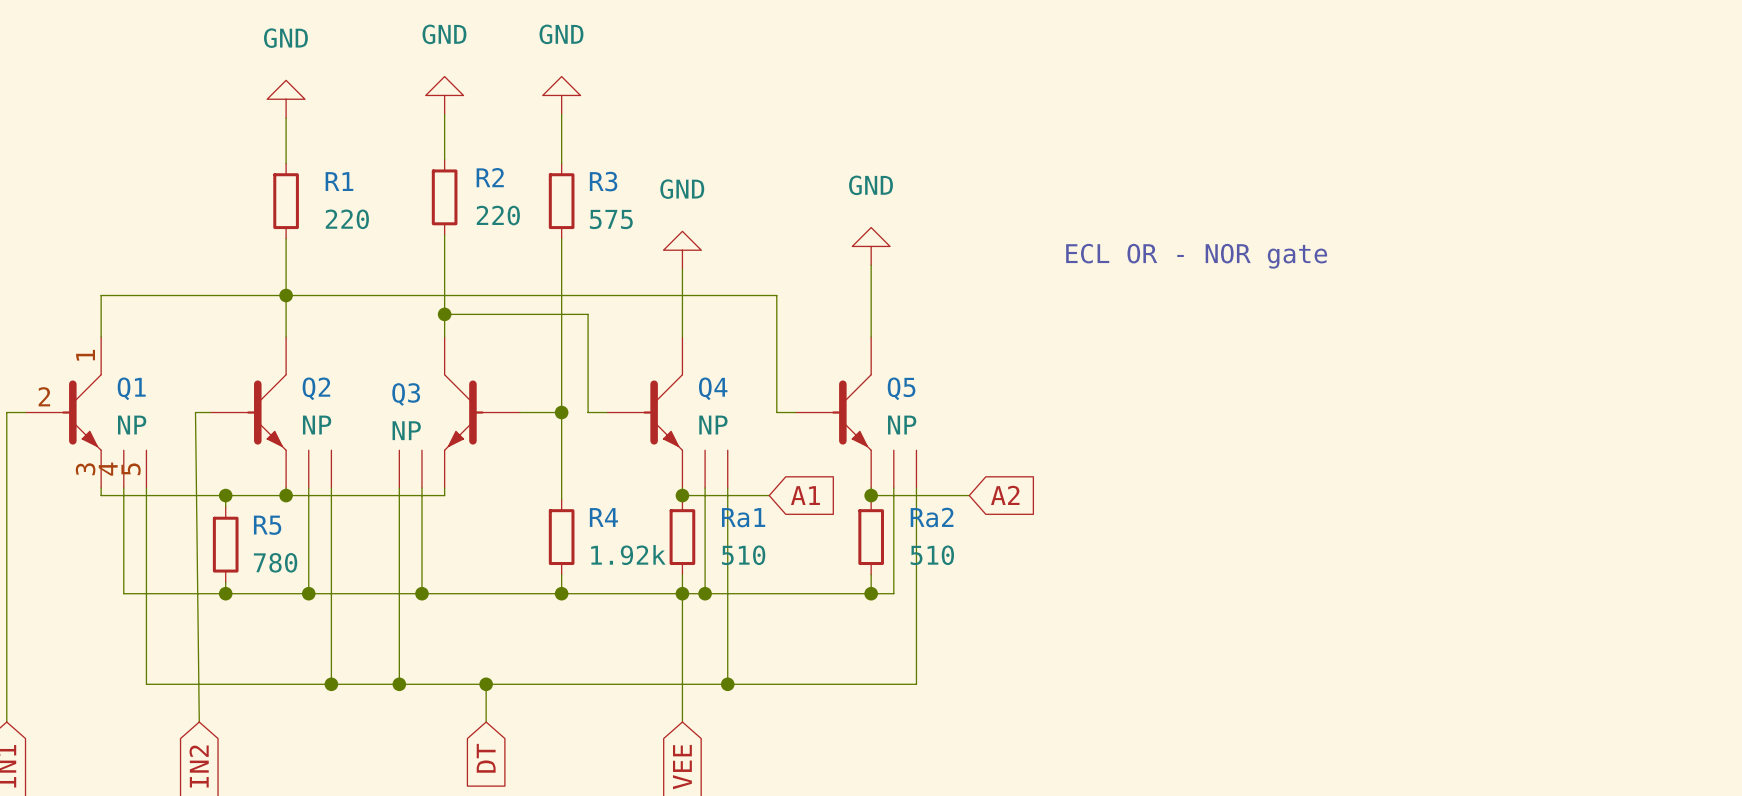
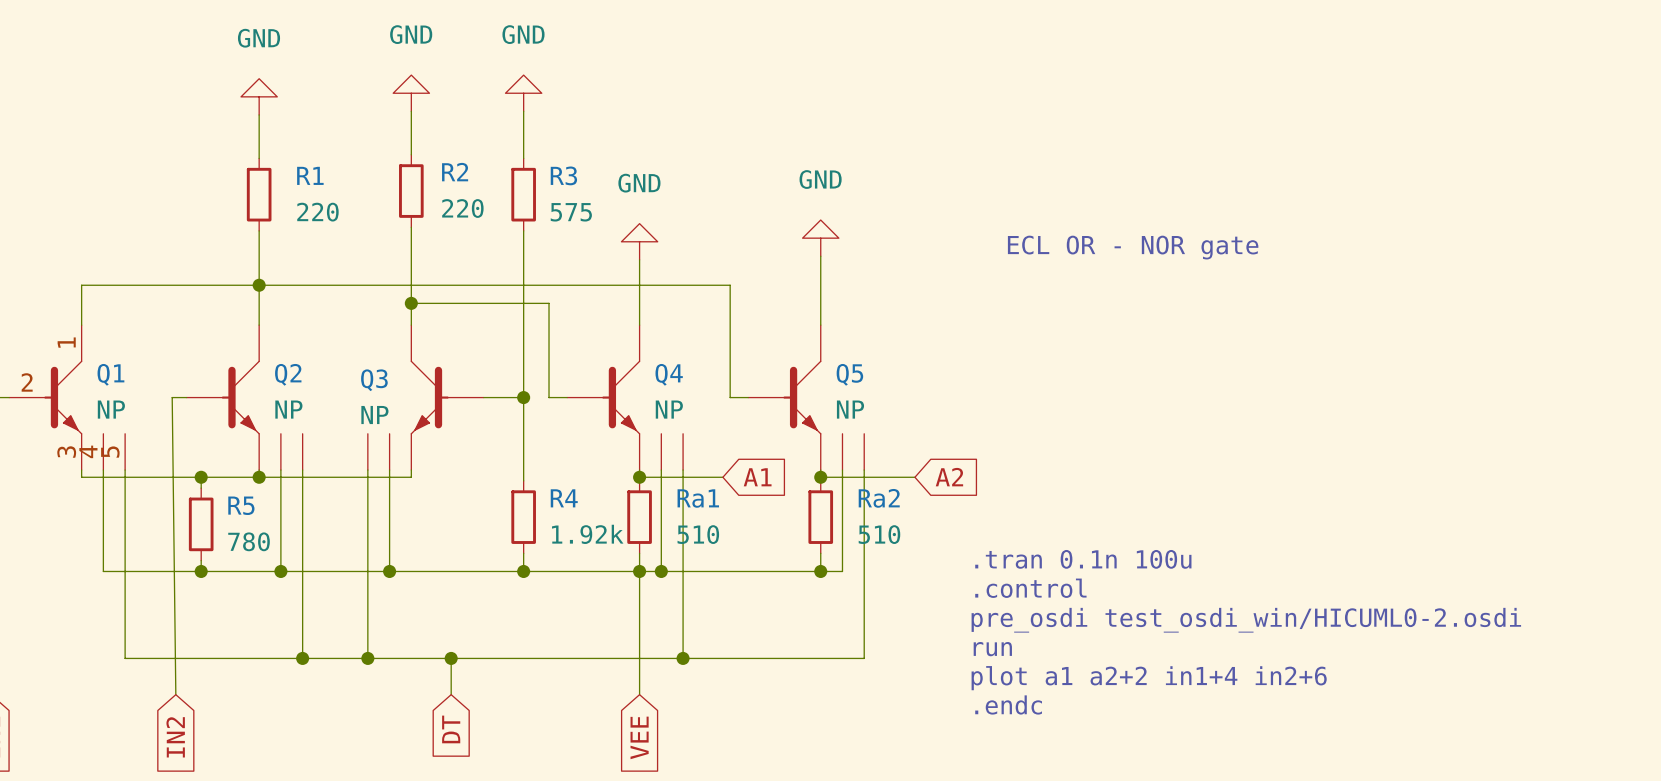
text: none -> .tran 0.1n 100u (1083, 559)
text: none -> .control (1030, 588)
text: none -> pre_osdi test_osdi_win/HICUML0-2.osdi (1246, 620)
text: none -> run (992, 649)
text: none -> plot a1 a2+2 in1+4 in2+6 (1149, 678)
text: none -> .endc (1008, 704)

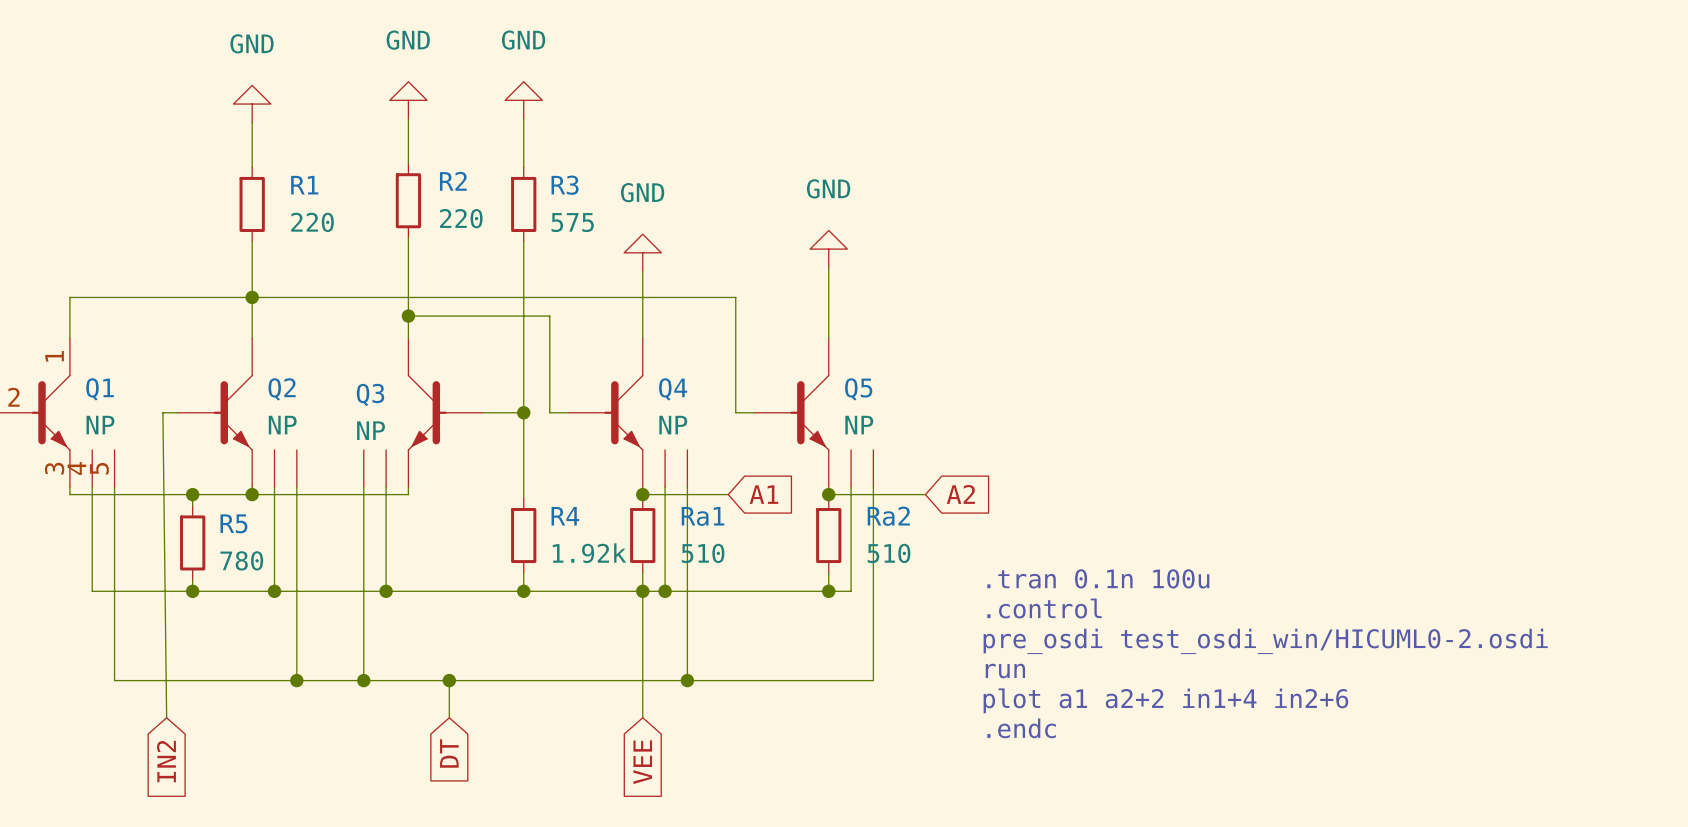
text: ECL OR - NOR gate (1133, 247) -> none

